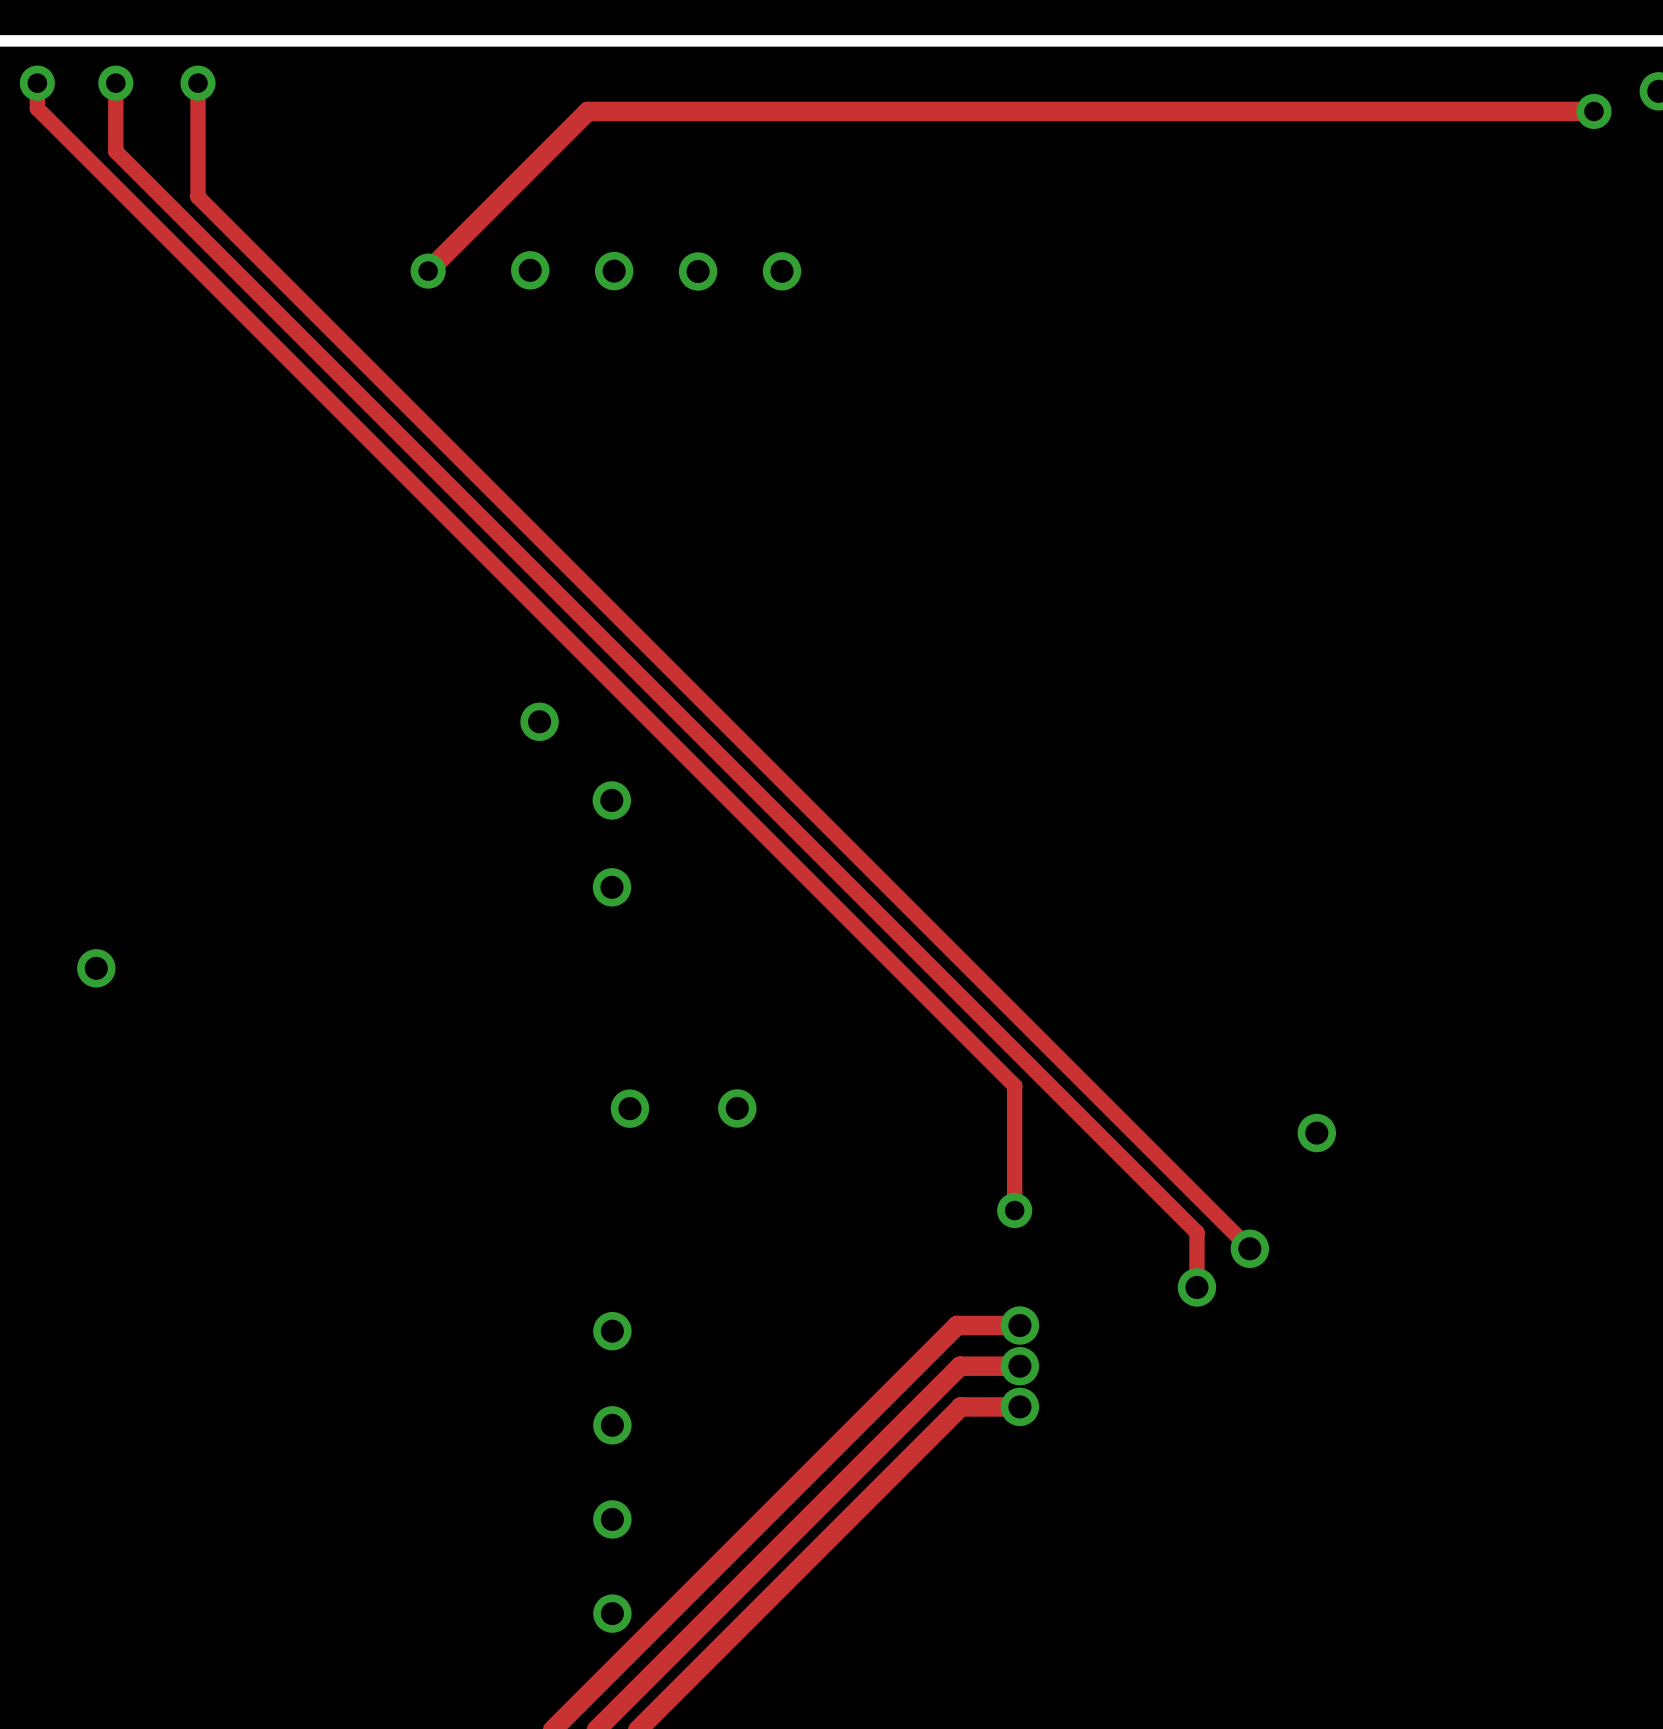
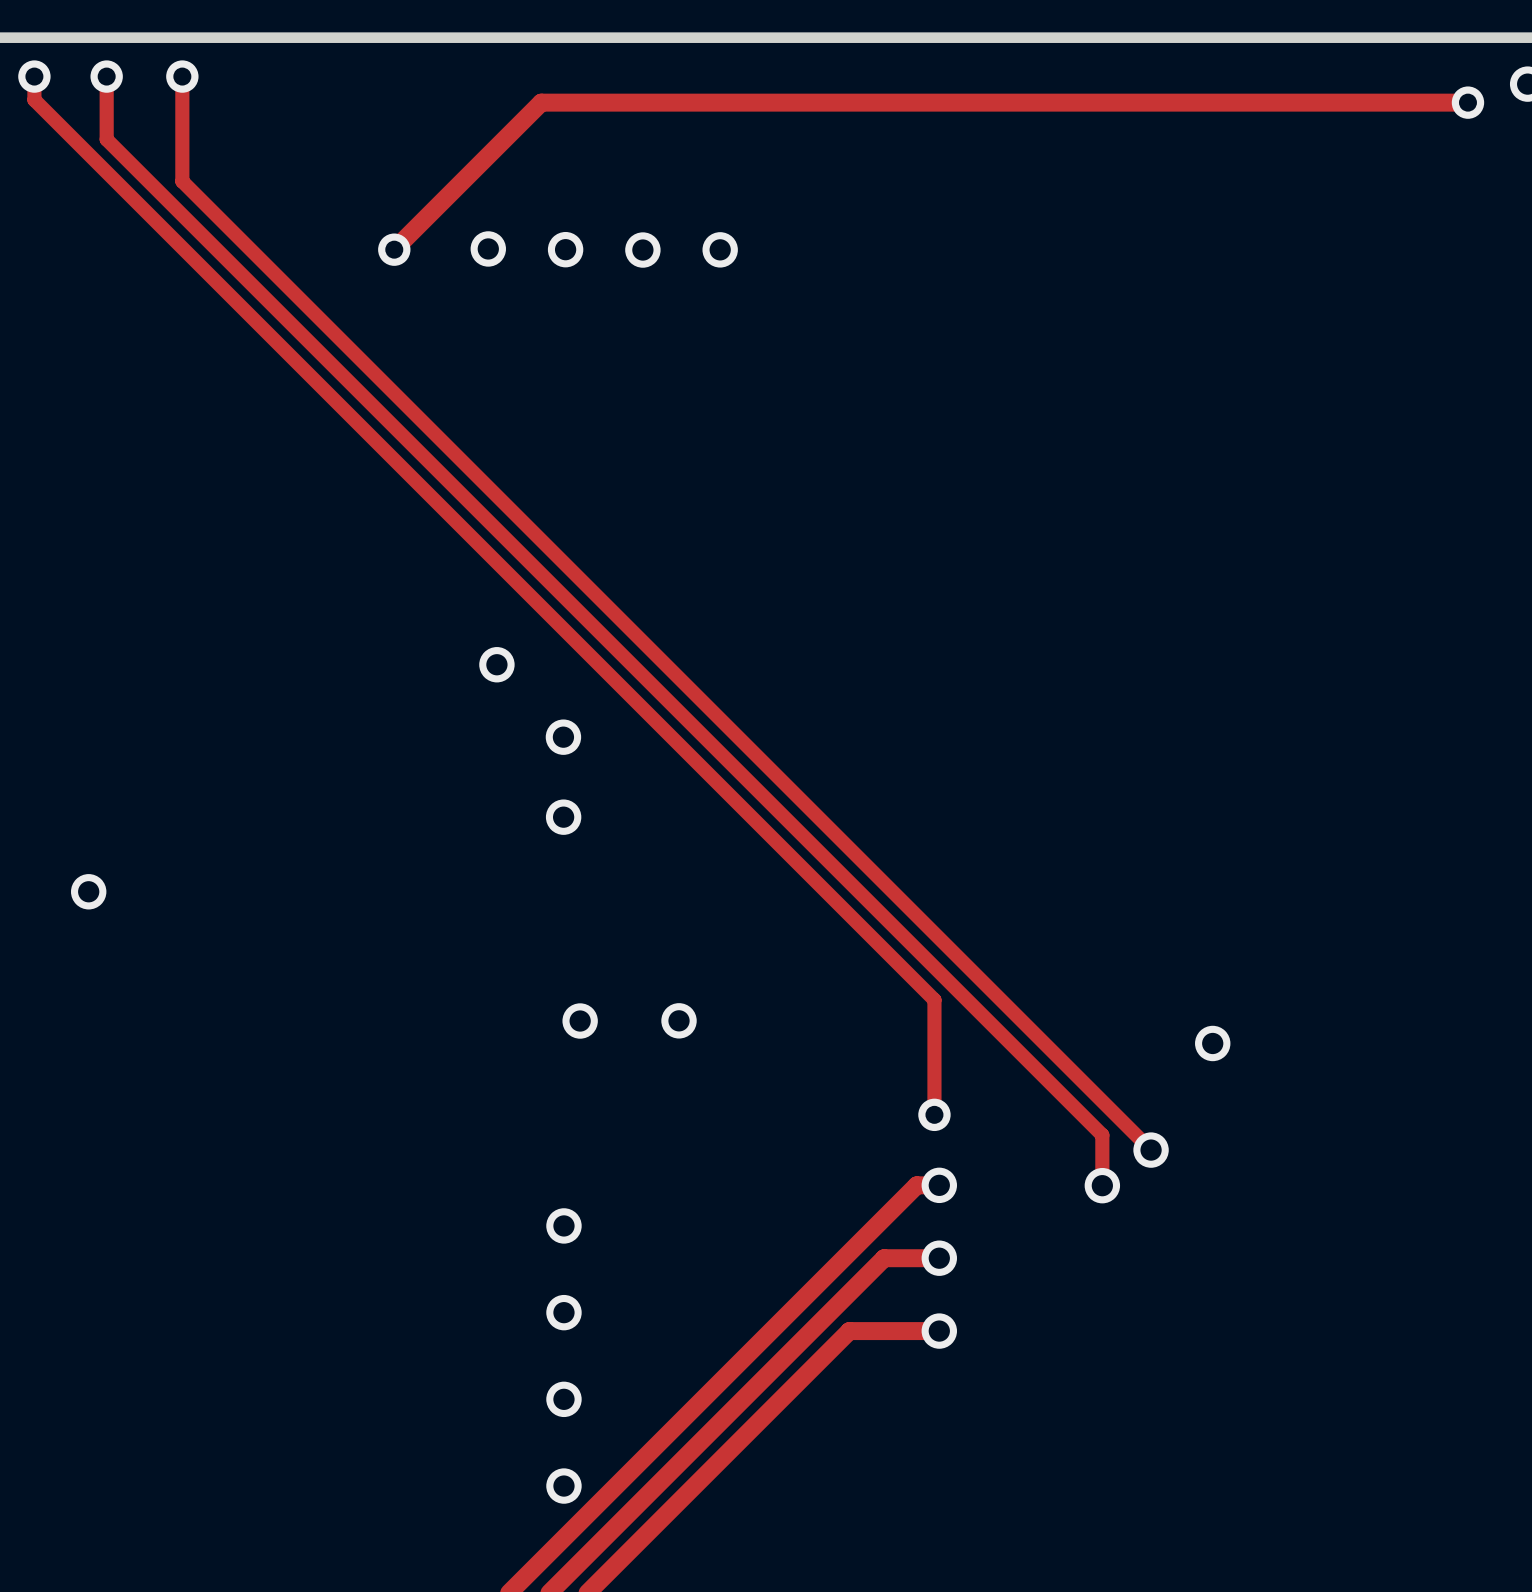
track: (957, 1325) (1019, 1325) -> (881, 1220) (916, 1185) (939, 1185)
via position: (1019, 1325) -> (939, 1185)
track: (1019, 1406) (960, 1406) (922, 1445) -> (939, 1331) (849, 1331)
via position: (1019, 1406) -> (939, 1331)

